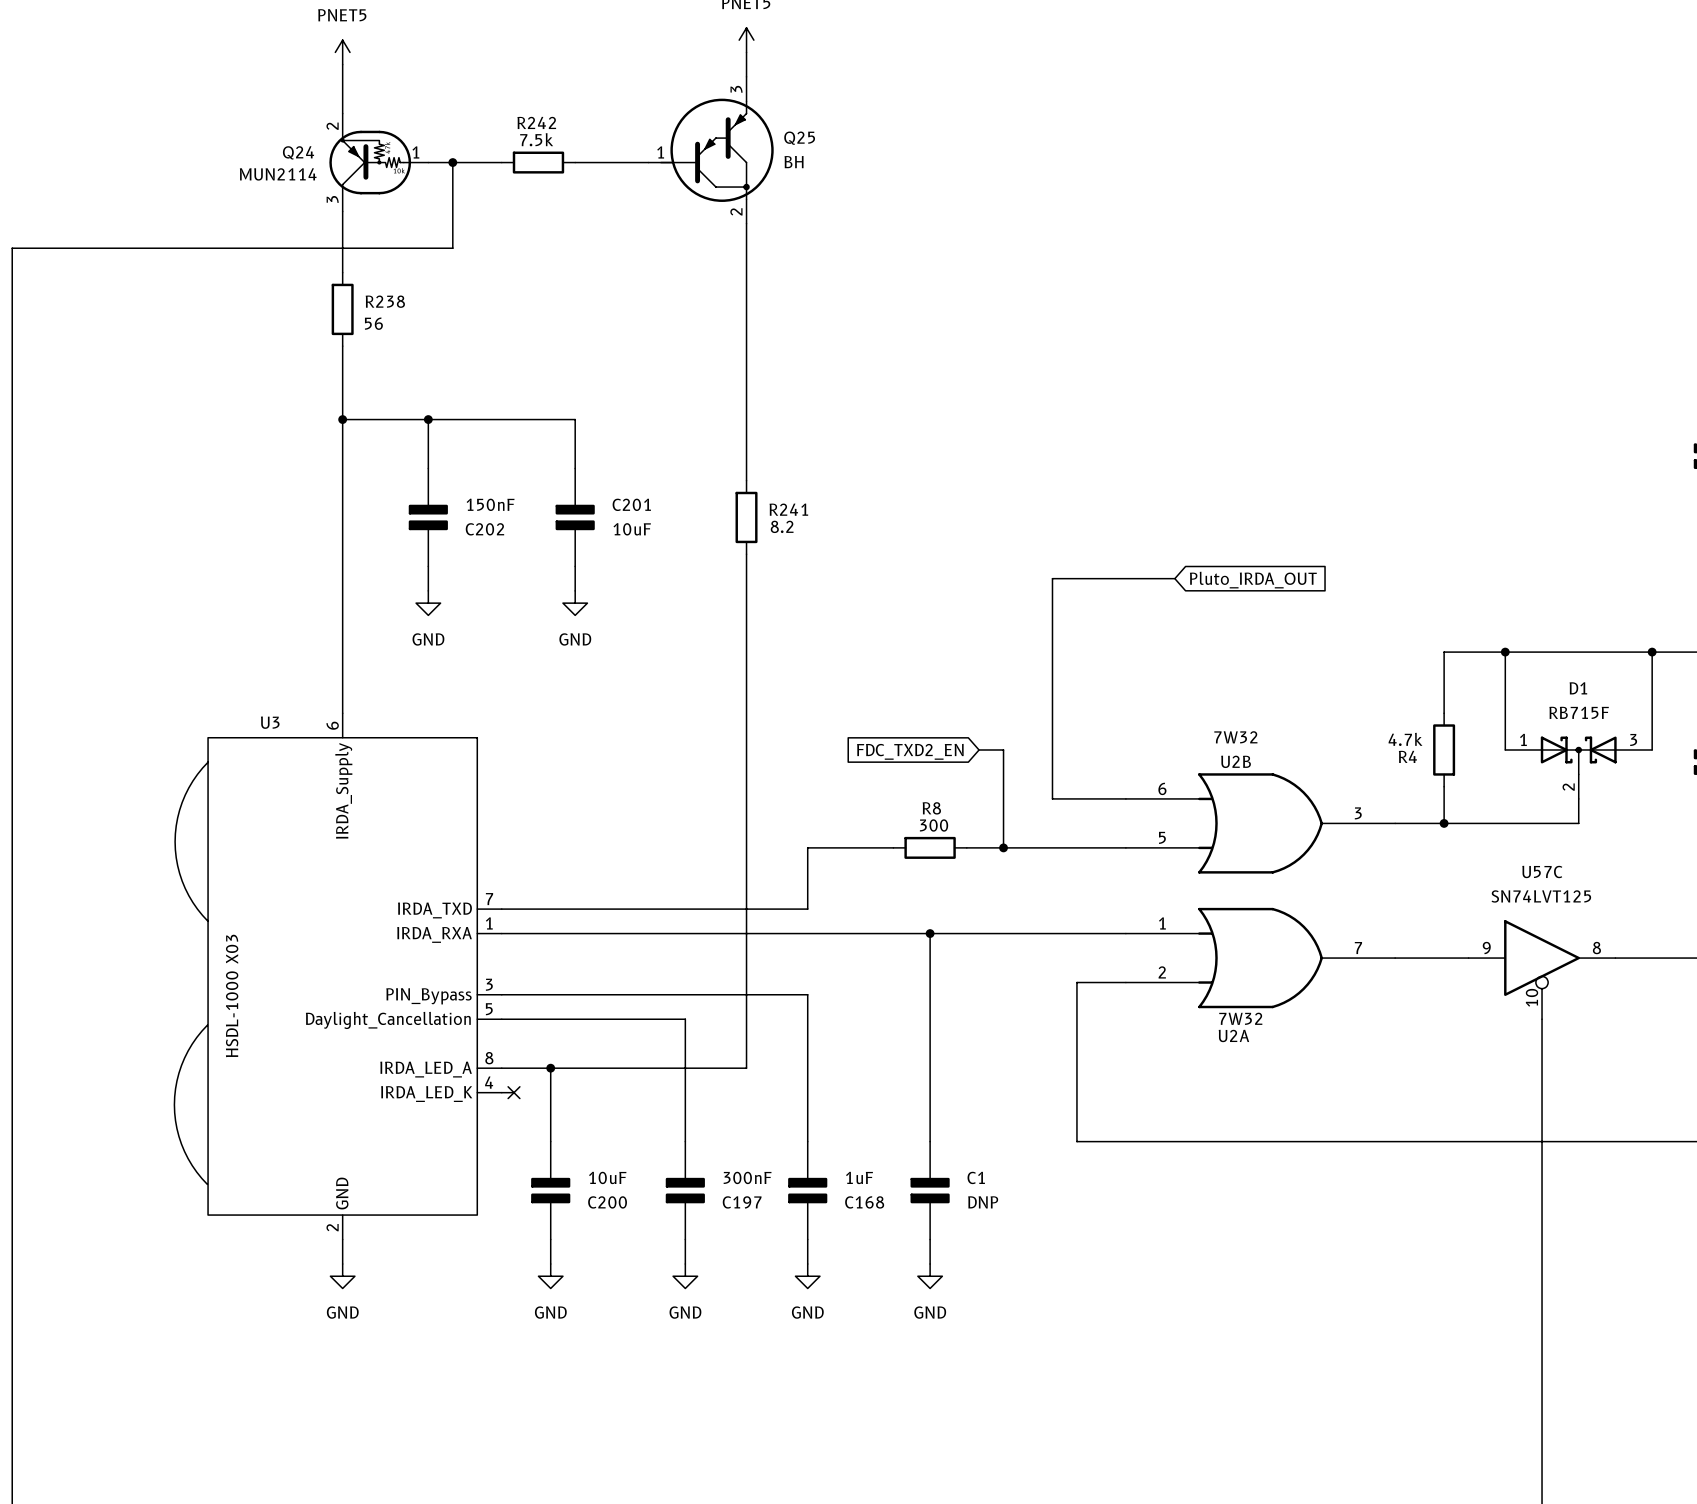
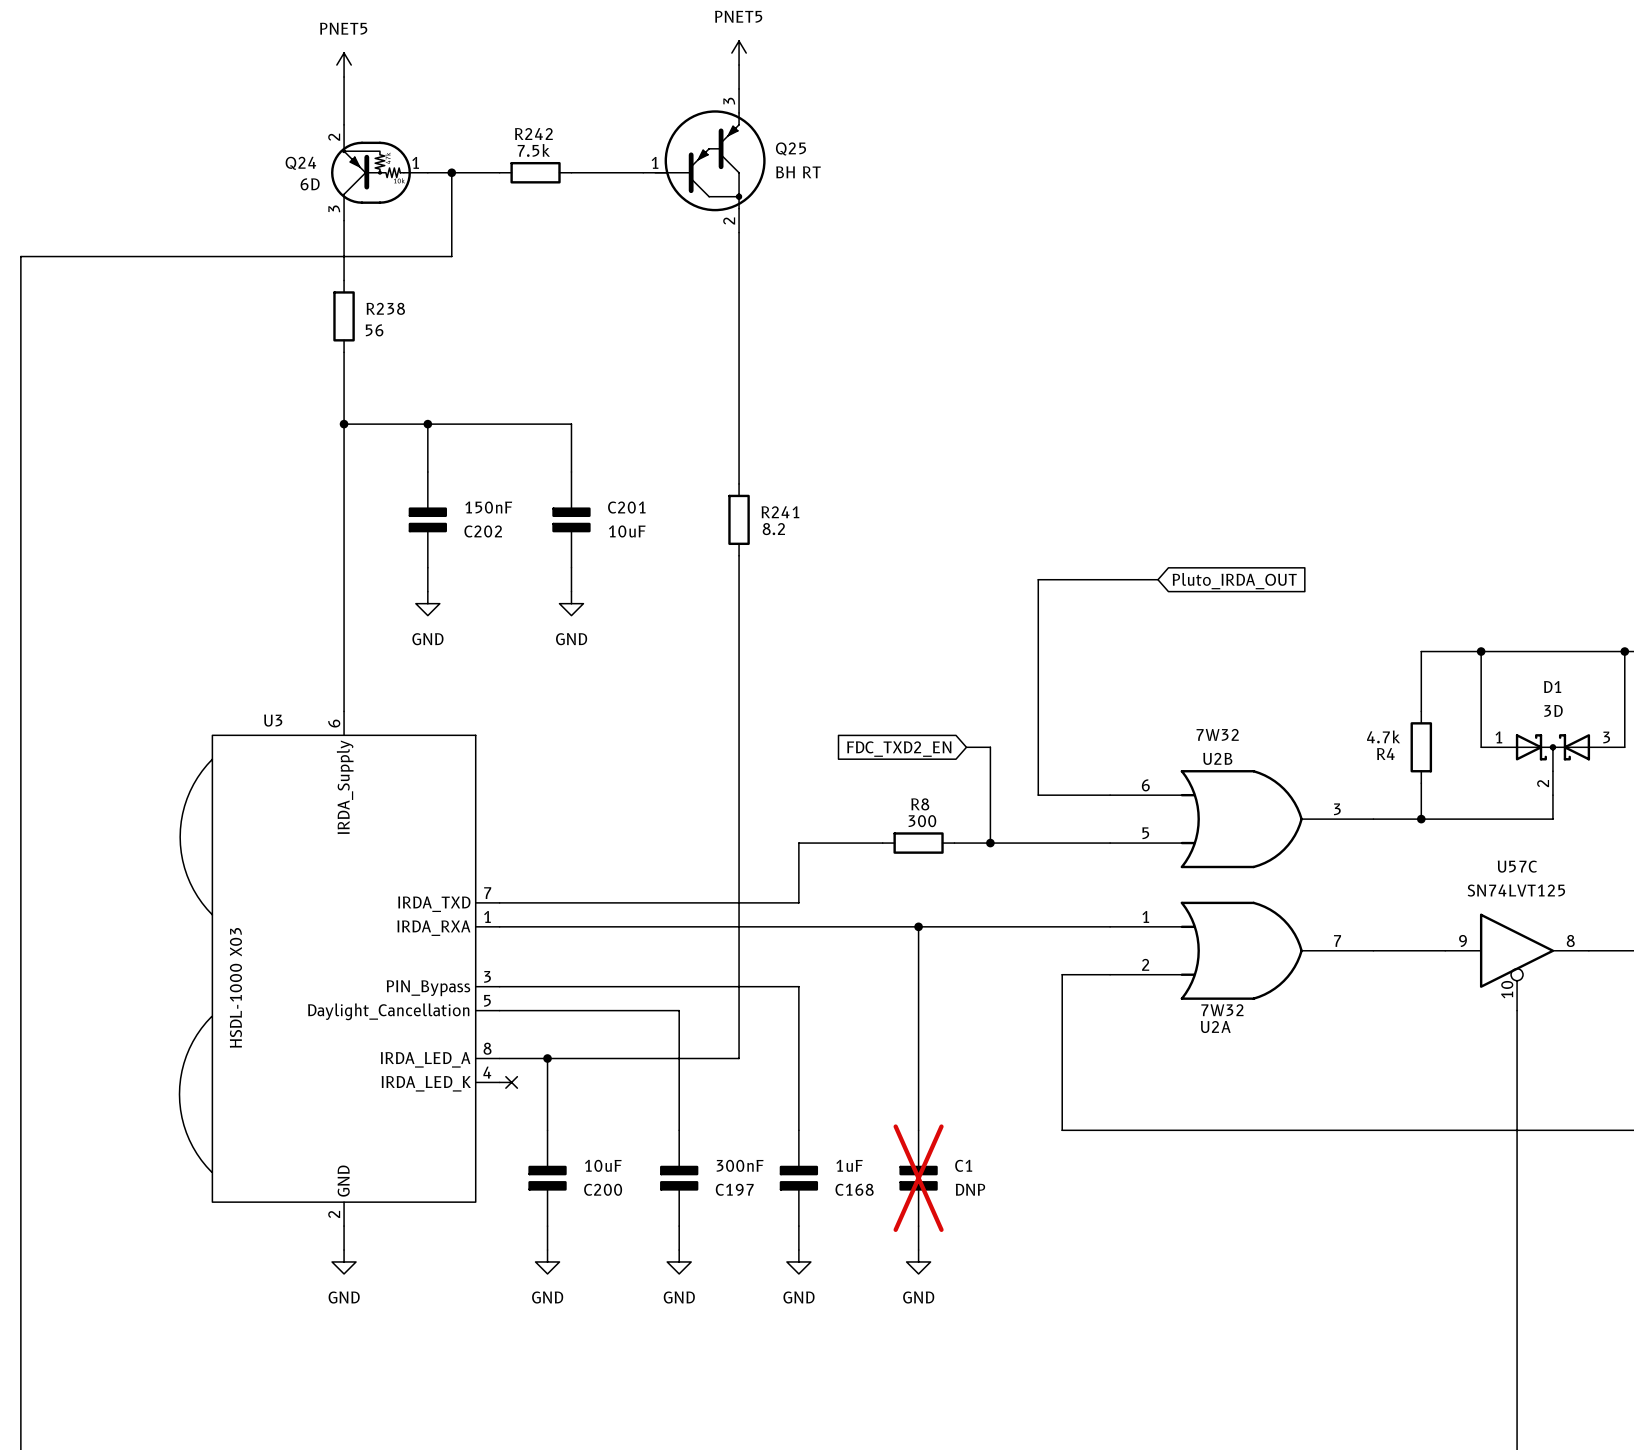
Q25 value: BH (794, 162) -> BH RT (798, 172)
Q24 value: MUN2114 (278, 174) -> 6D (310, 184)
D1 value: RB715F (1579, 712) -> 3D (1553, 710)
C1 do-not-place cross: none -> (918, 1178)

